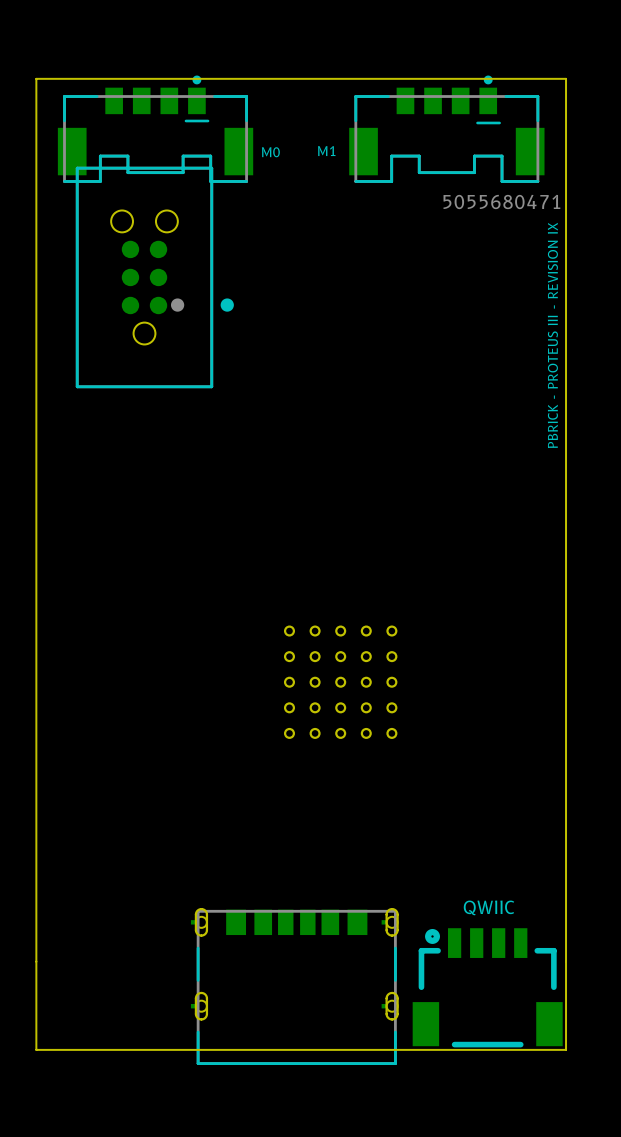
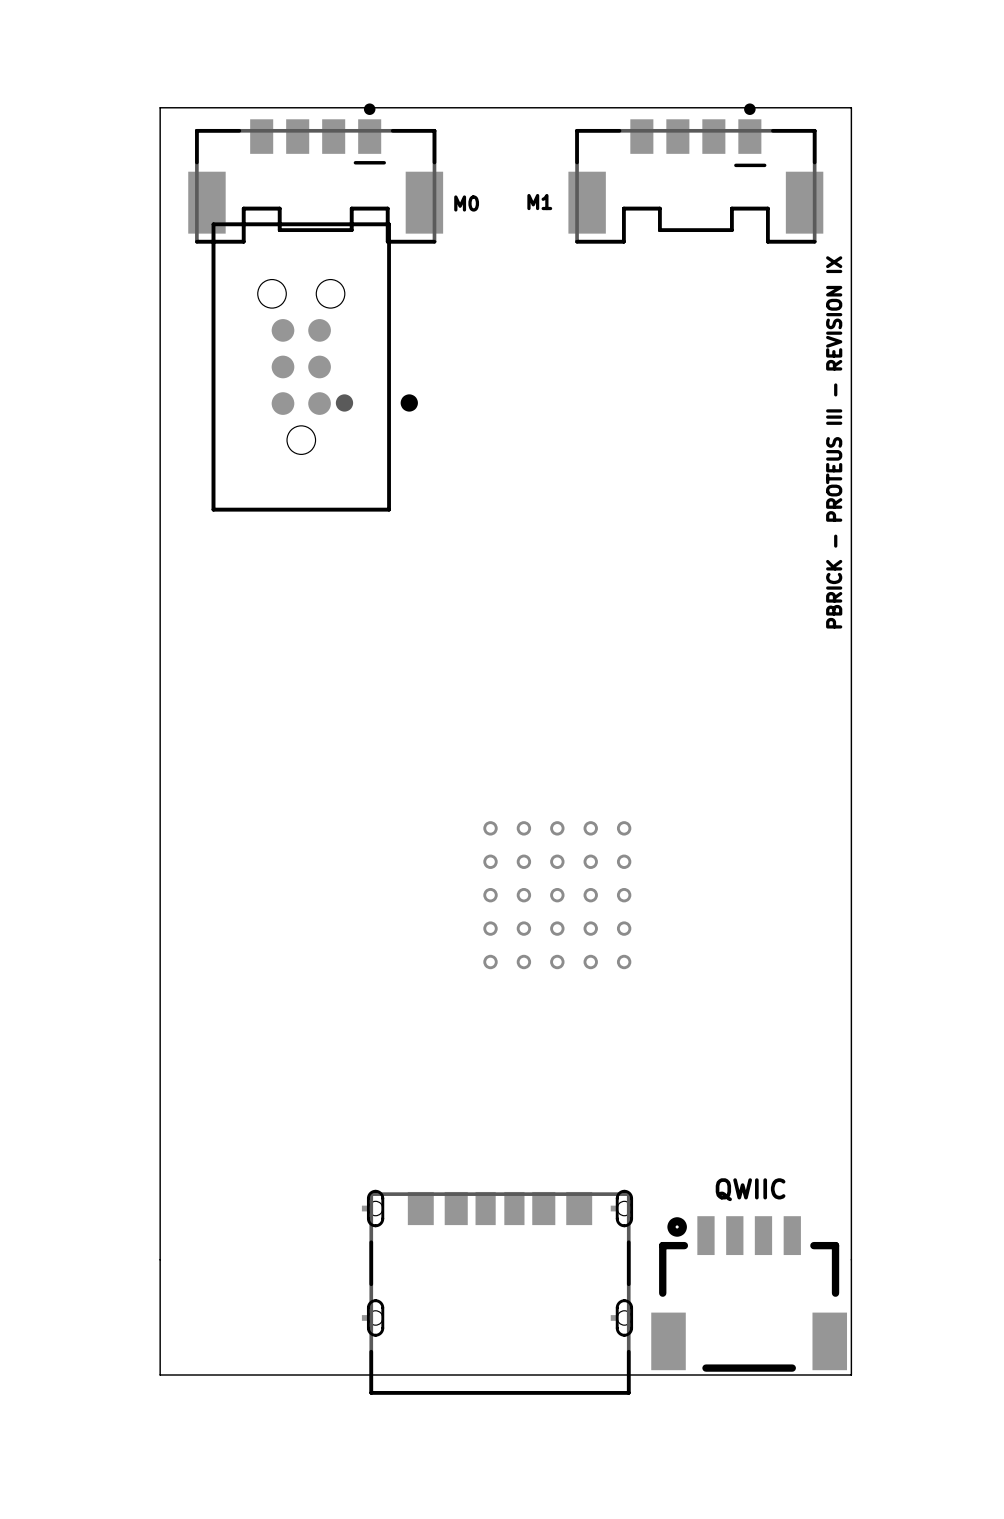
M1 value: 5055680471 (501, 201) -> none

